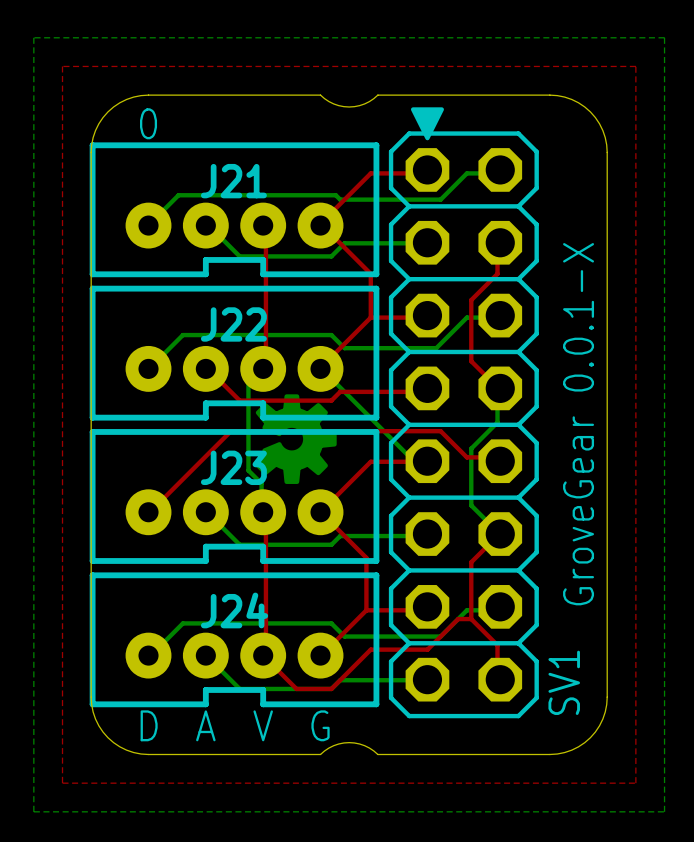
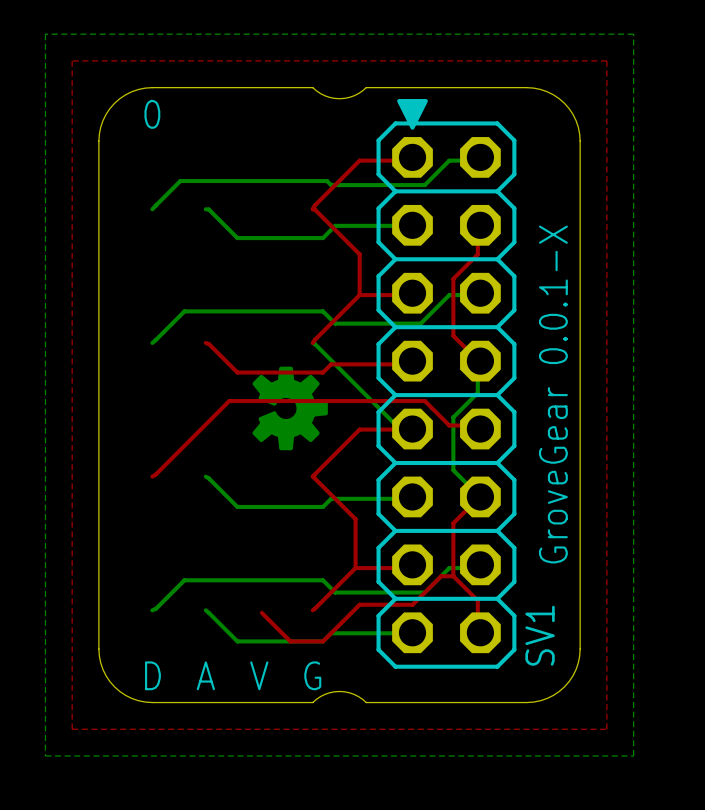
J21: (234, 209) -> none
top track: (263, 225) (265, 225) (265, 365) (263, 368) -> none
J22: (234, 353) -> none
bottom track: (263, 368) (248, 383) (248, 470) (261, 483) (263, 512) -> none
J23: (234, 496) -> none
top track: (263, 512) (265, 514) (265, 654) (263, 655) (265, 658) -> none
J24: (234, 639) -> none

